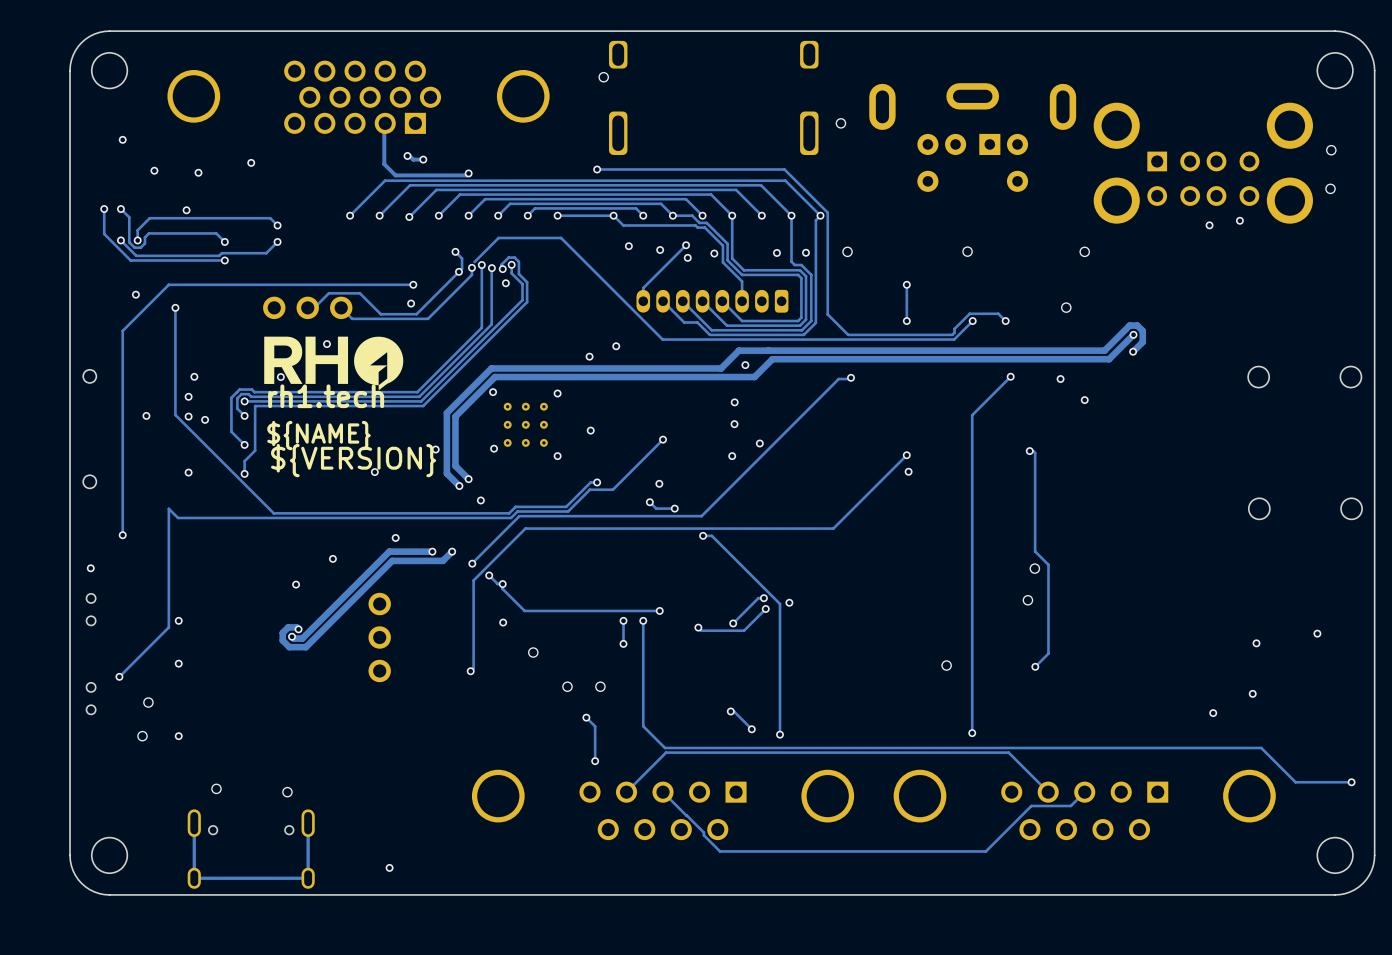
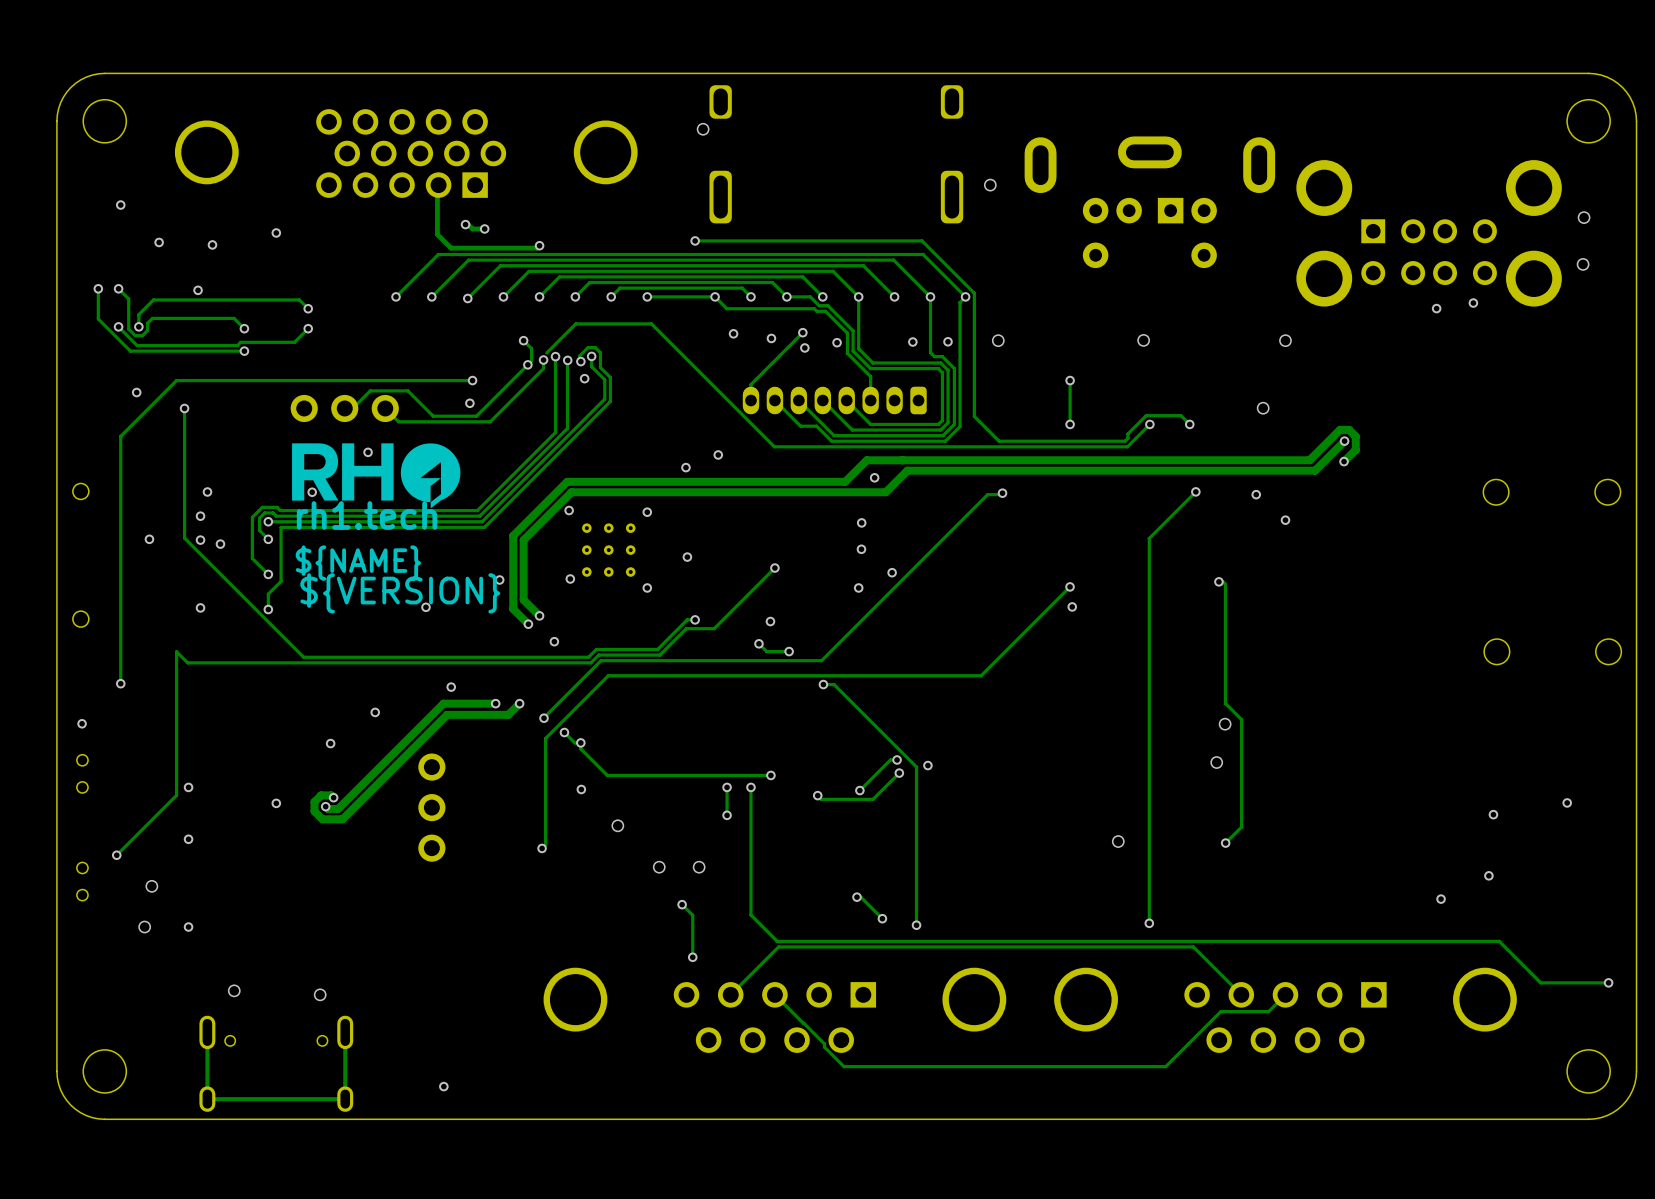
via: none -> (276, 803)

